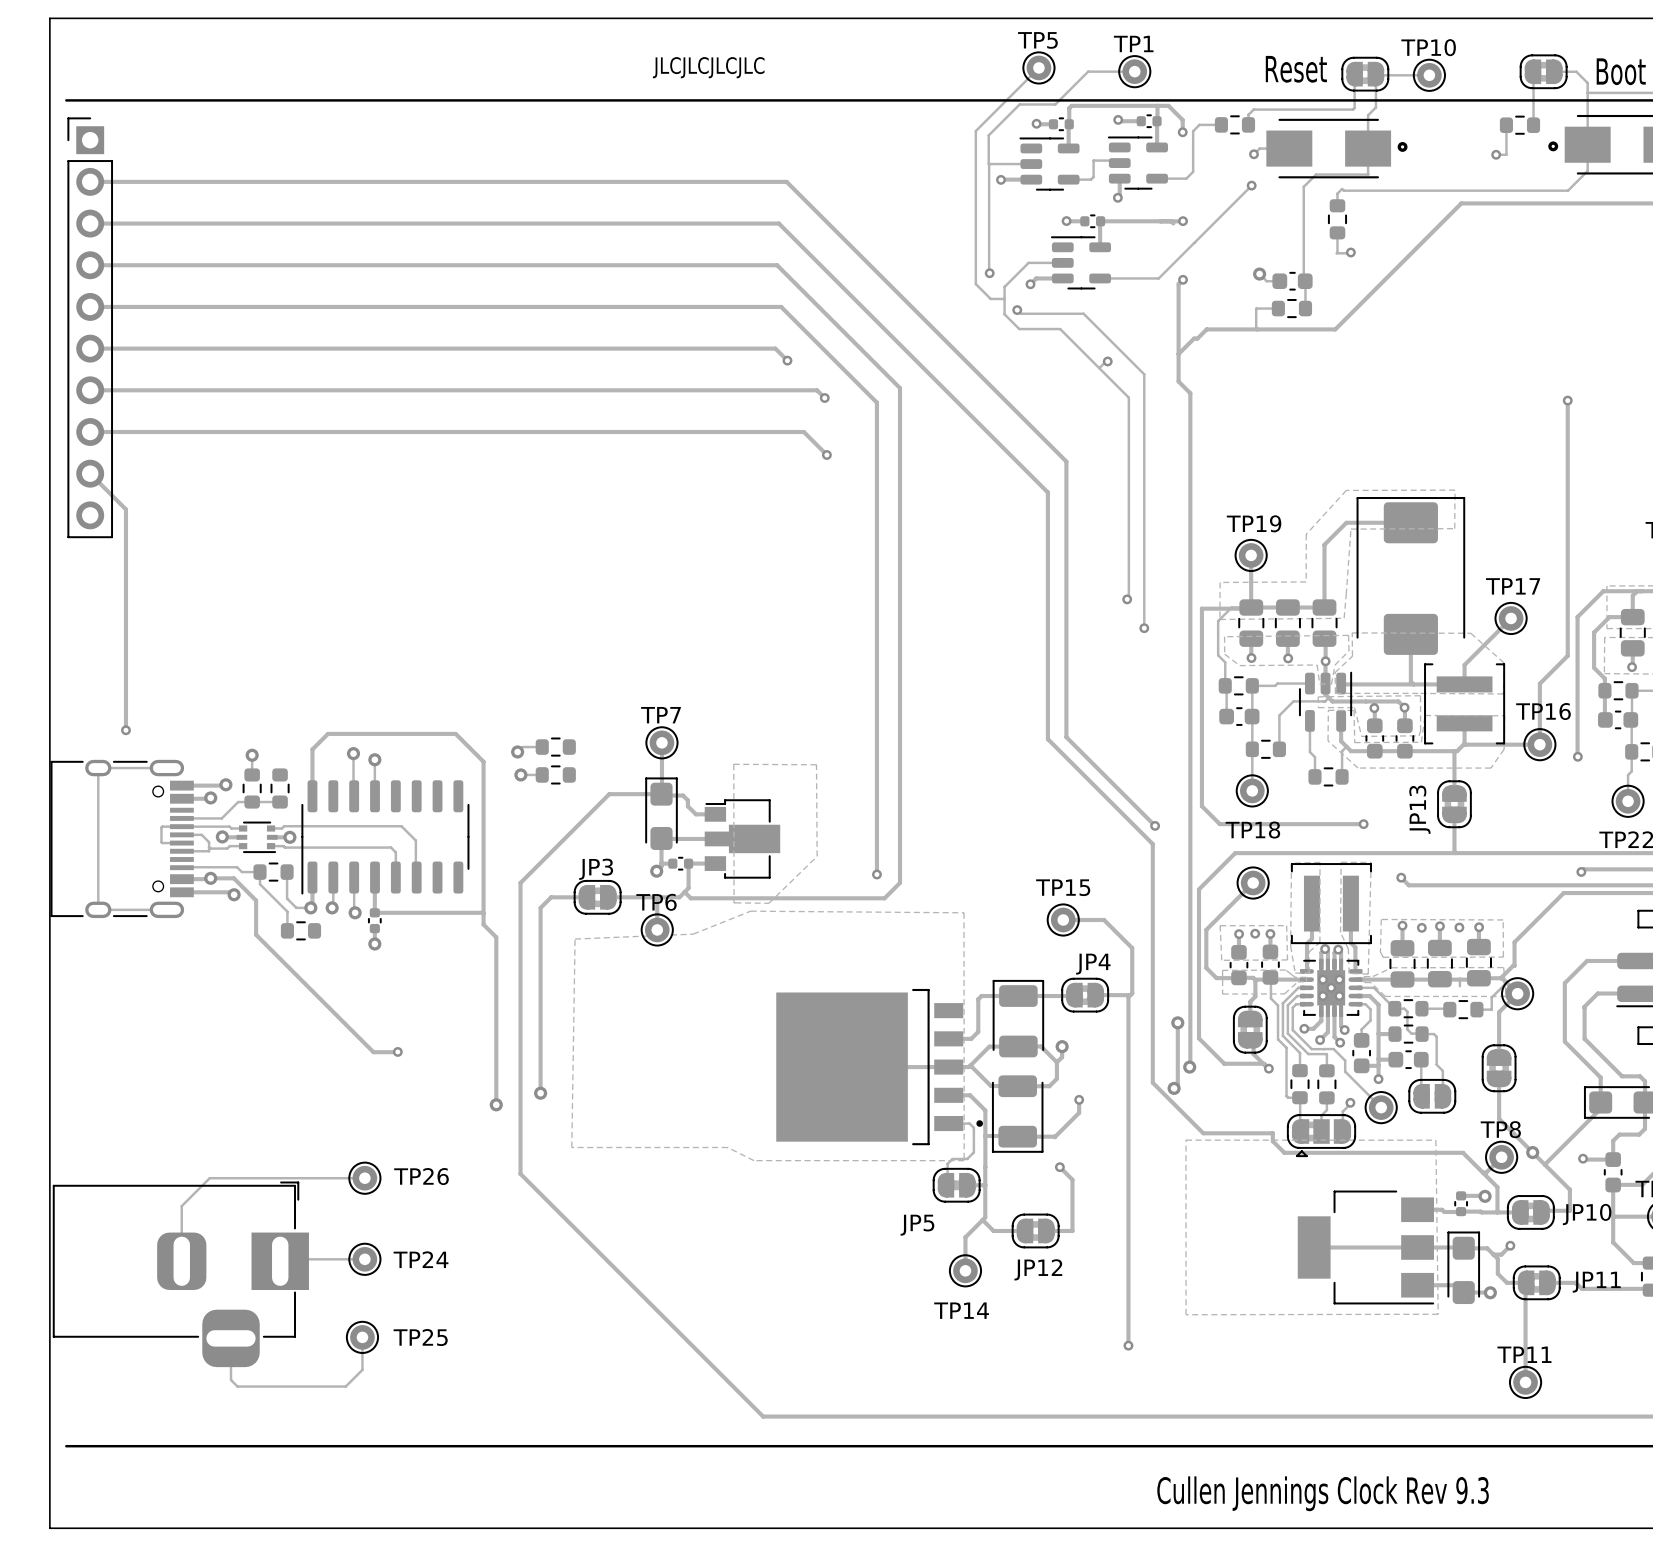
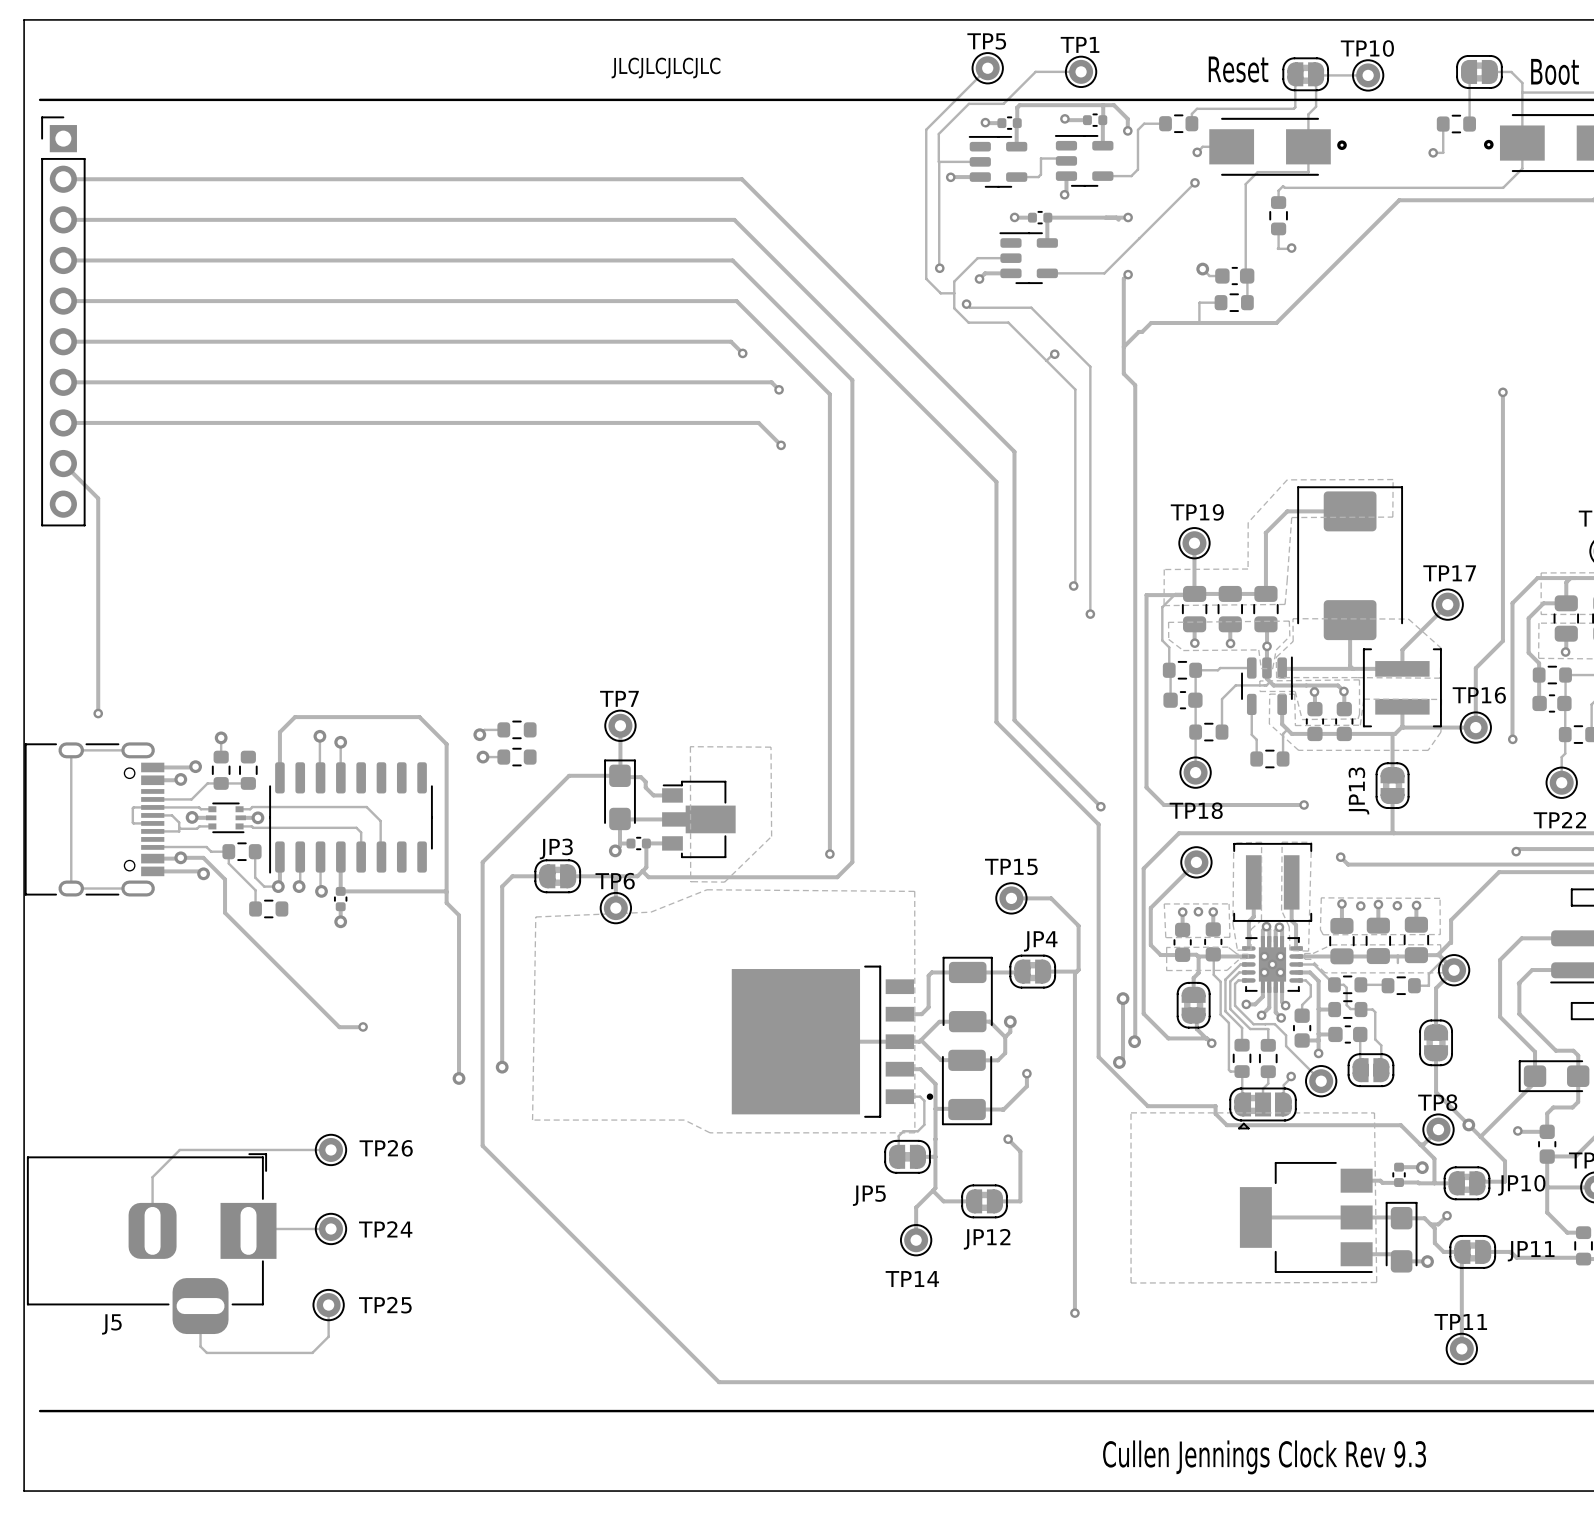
J5 name: none -> J5 (111, 1324)

